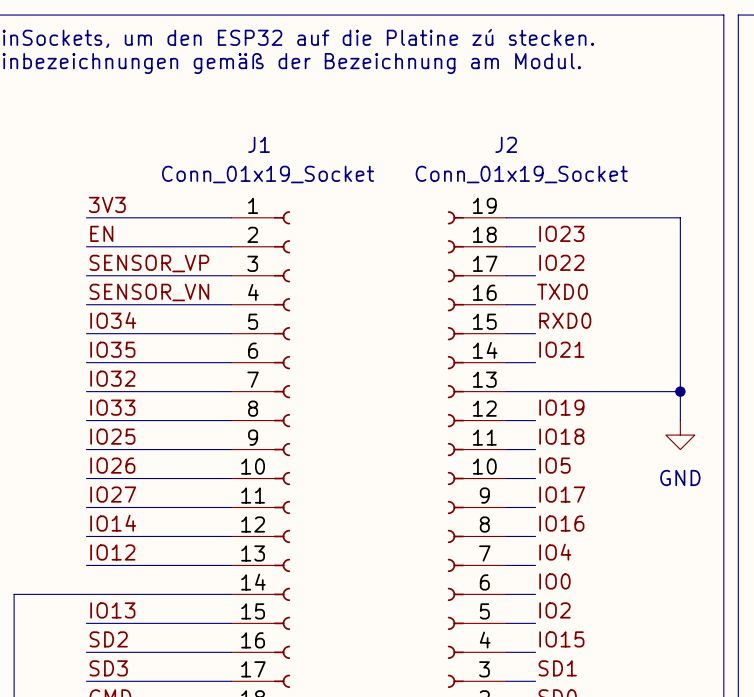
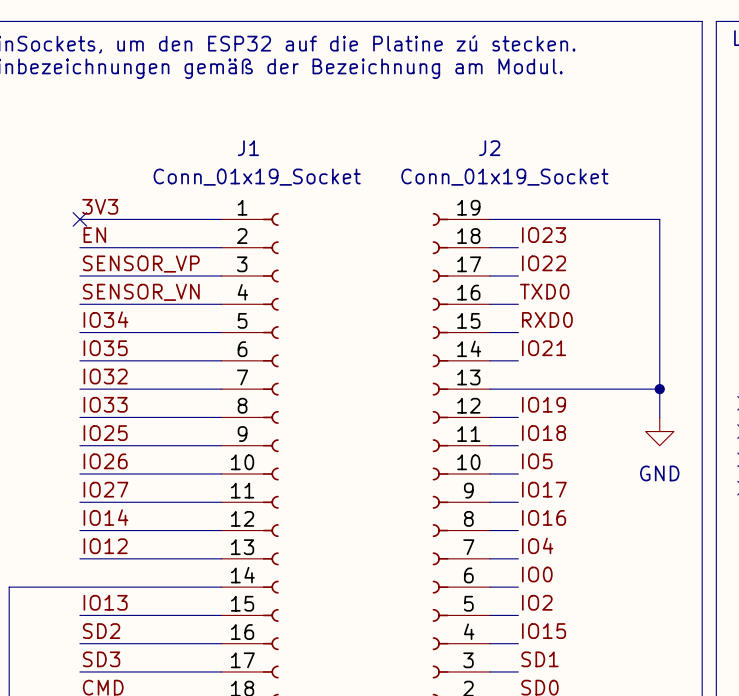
no-connect mark: none -> (79, 219)

